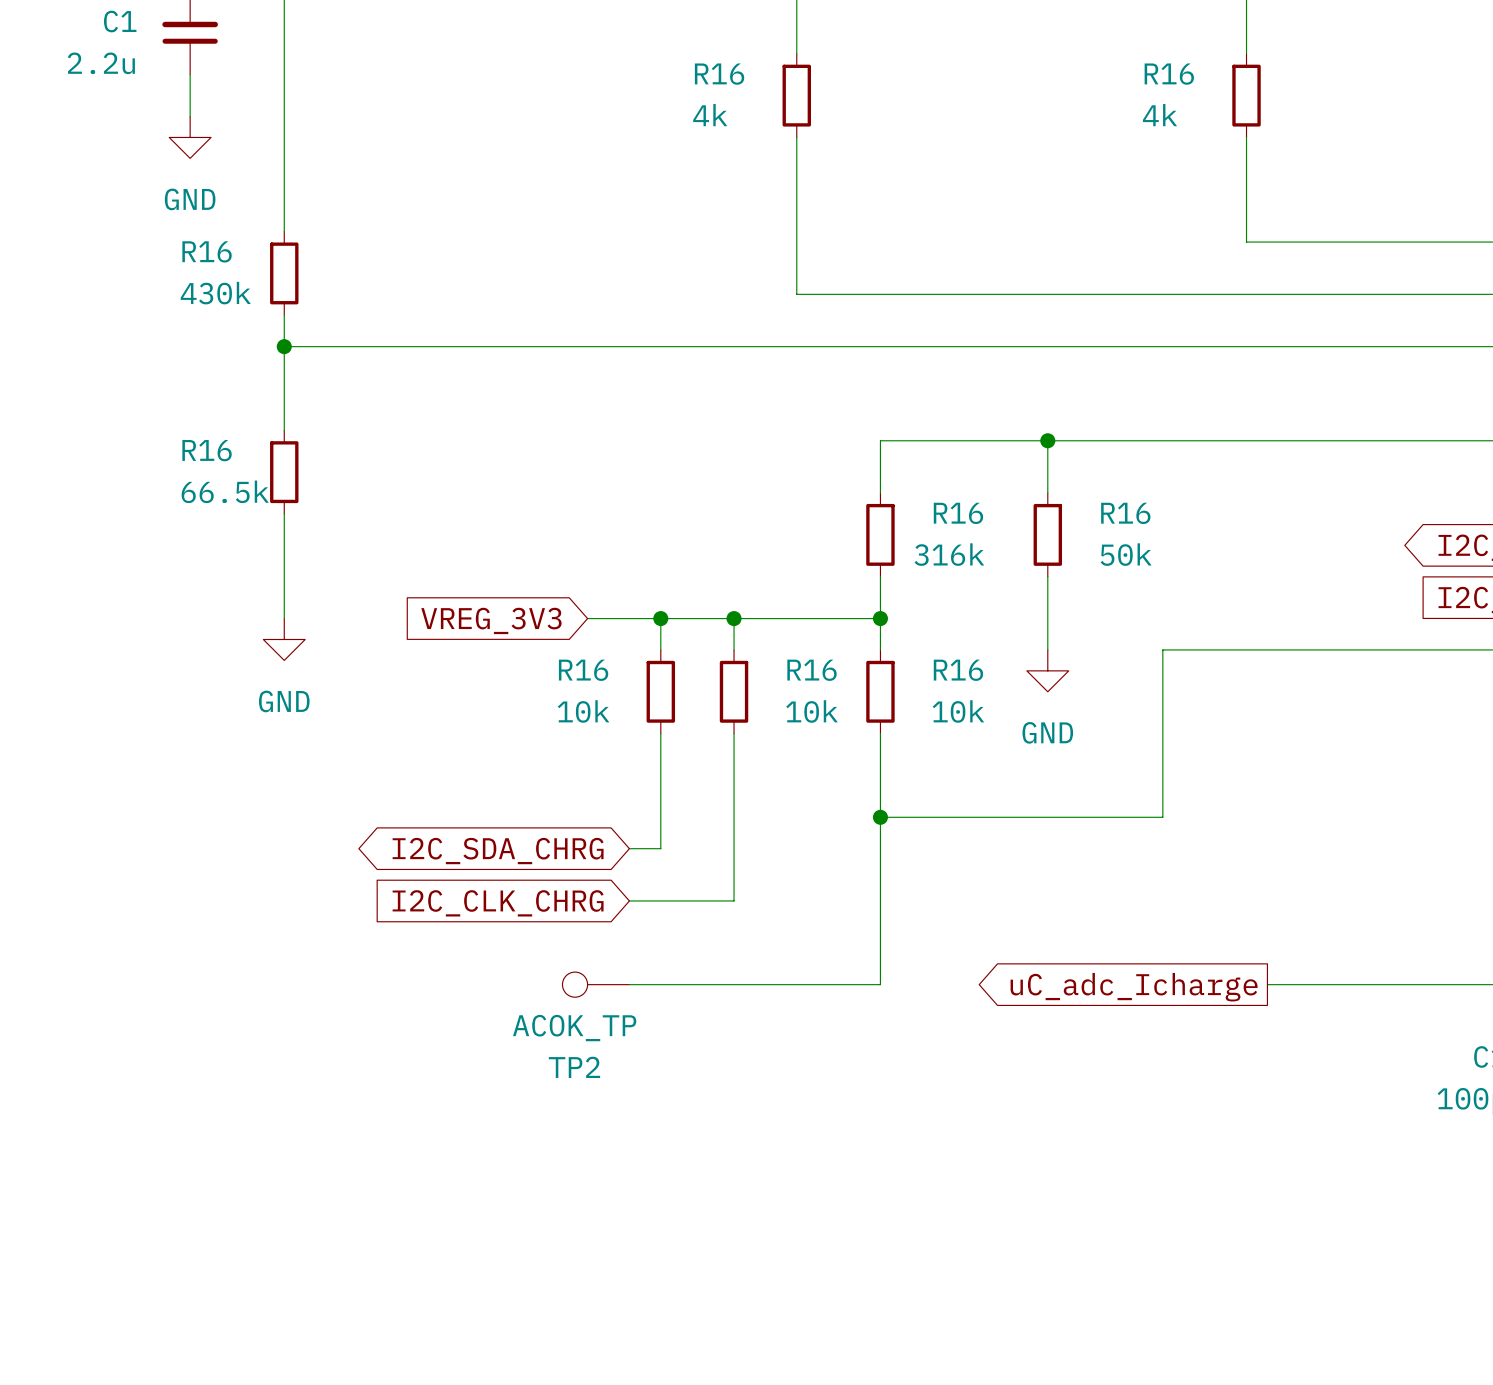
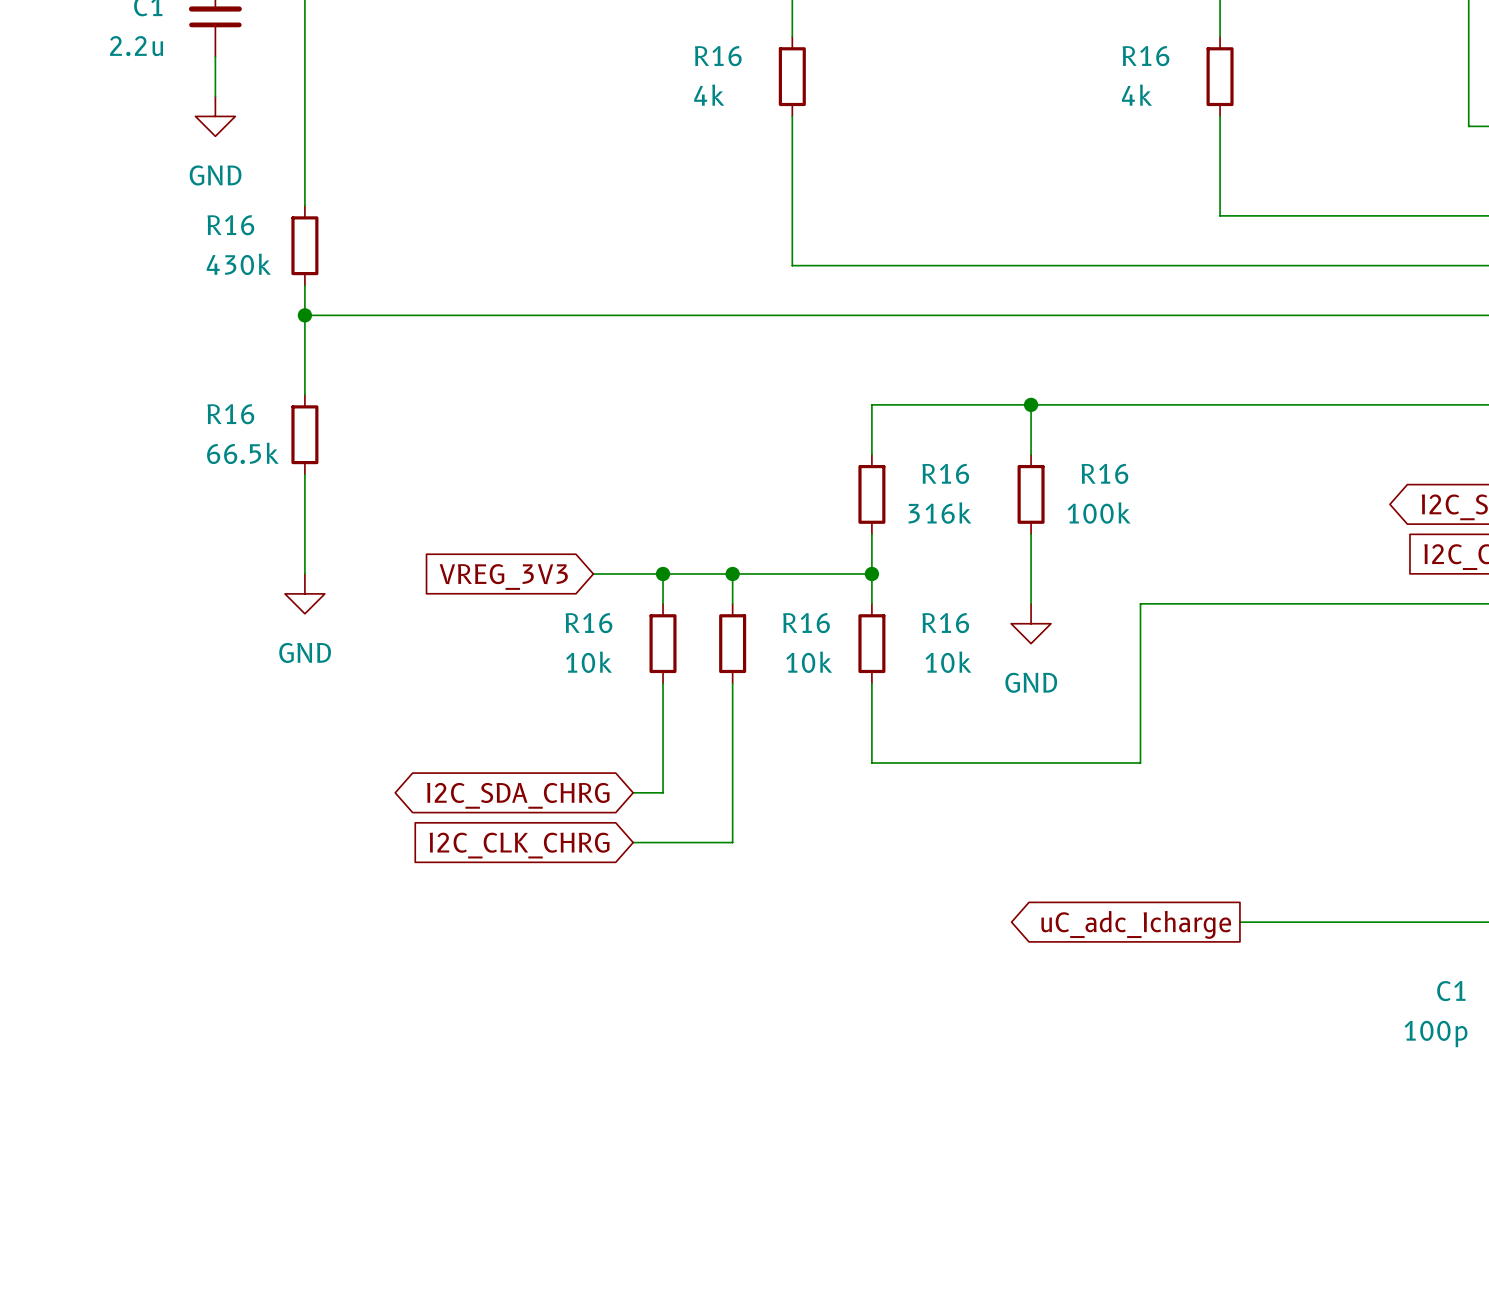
R16 value: 50k (1126, 554) -> 100k (1099, 513)
wire: (880, 817) (880, 984) (629, 984) -> none
junction: (880, 817) -> none
TP2: ACOK_TP (595, 984) -> none

